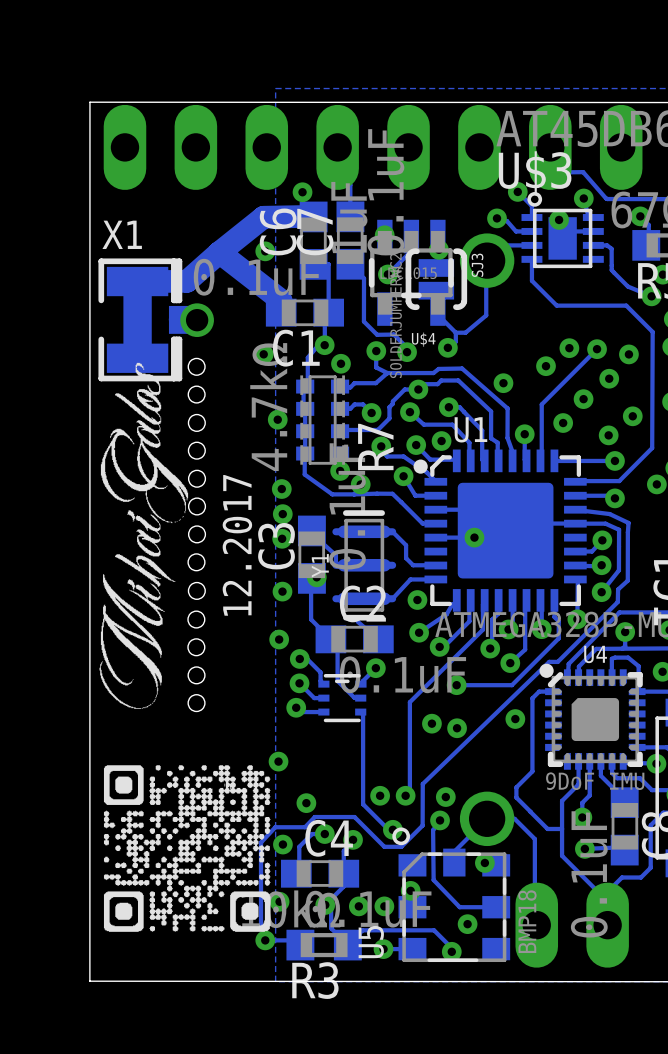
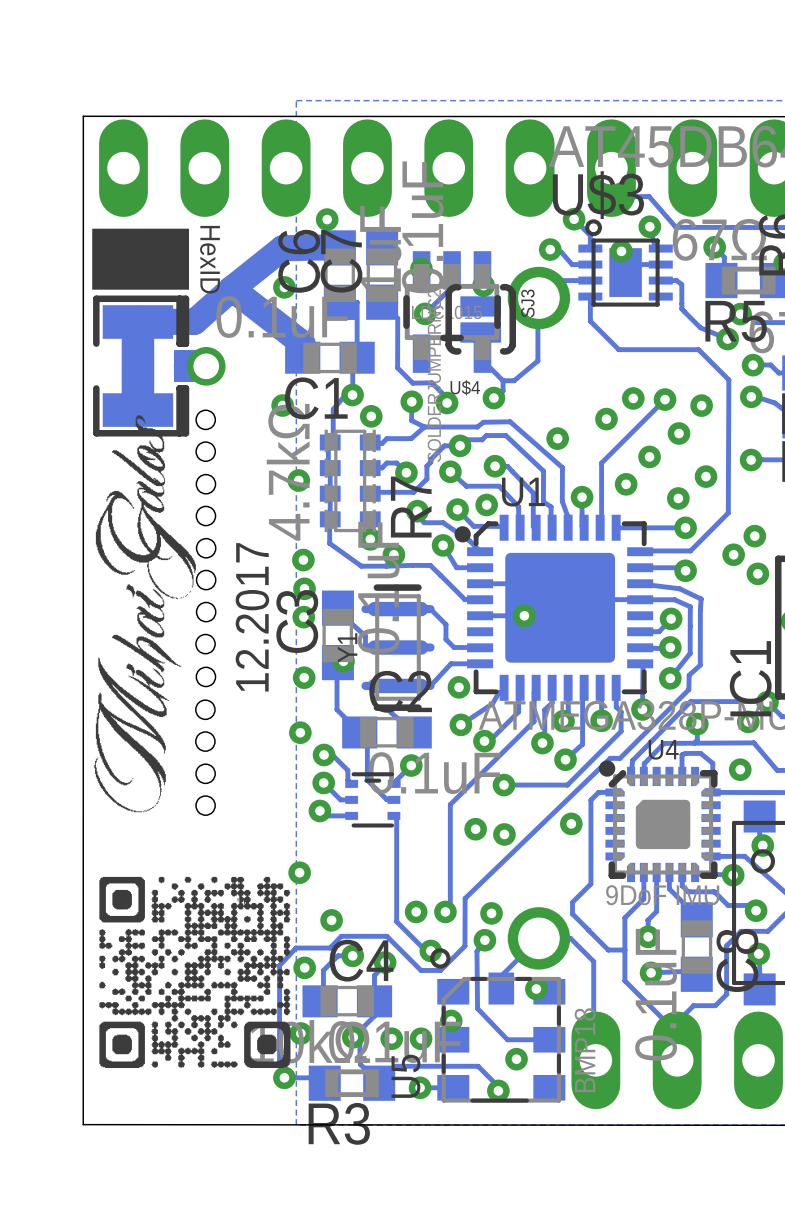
drawing: none -> [92, 228, 189, 290]
text: none -> HexID (210, 259)

